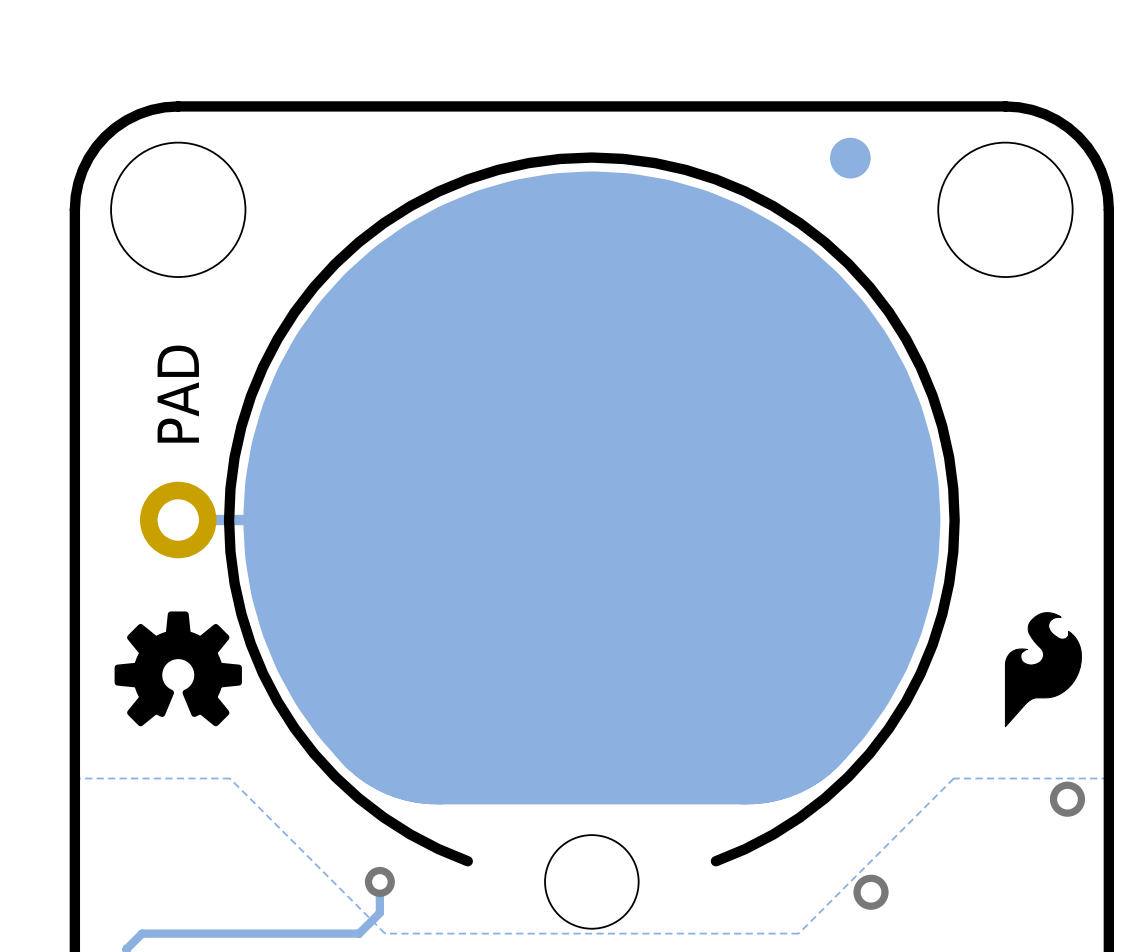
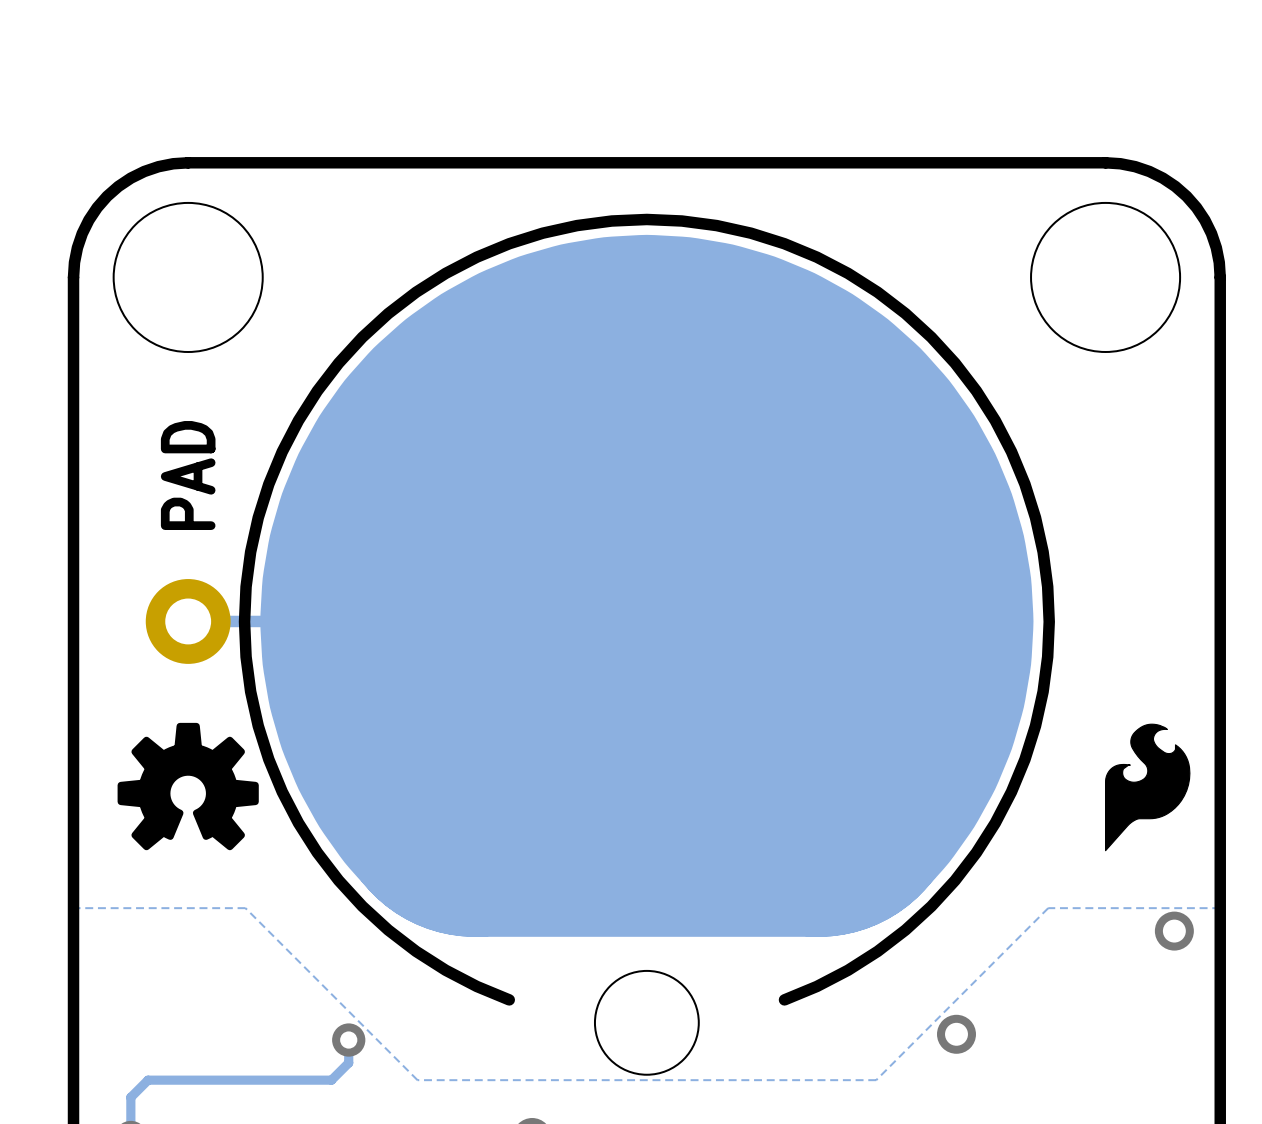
part: (850, 158) -> none
track: (379, 881) (379, 912) (359, 933) (307, 933) -> (348, 1040) (348, 1062) (331, 1080)
via position: (379, 881) -> (348, 1040)

